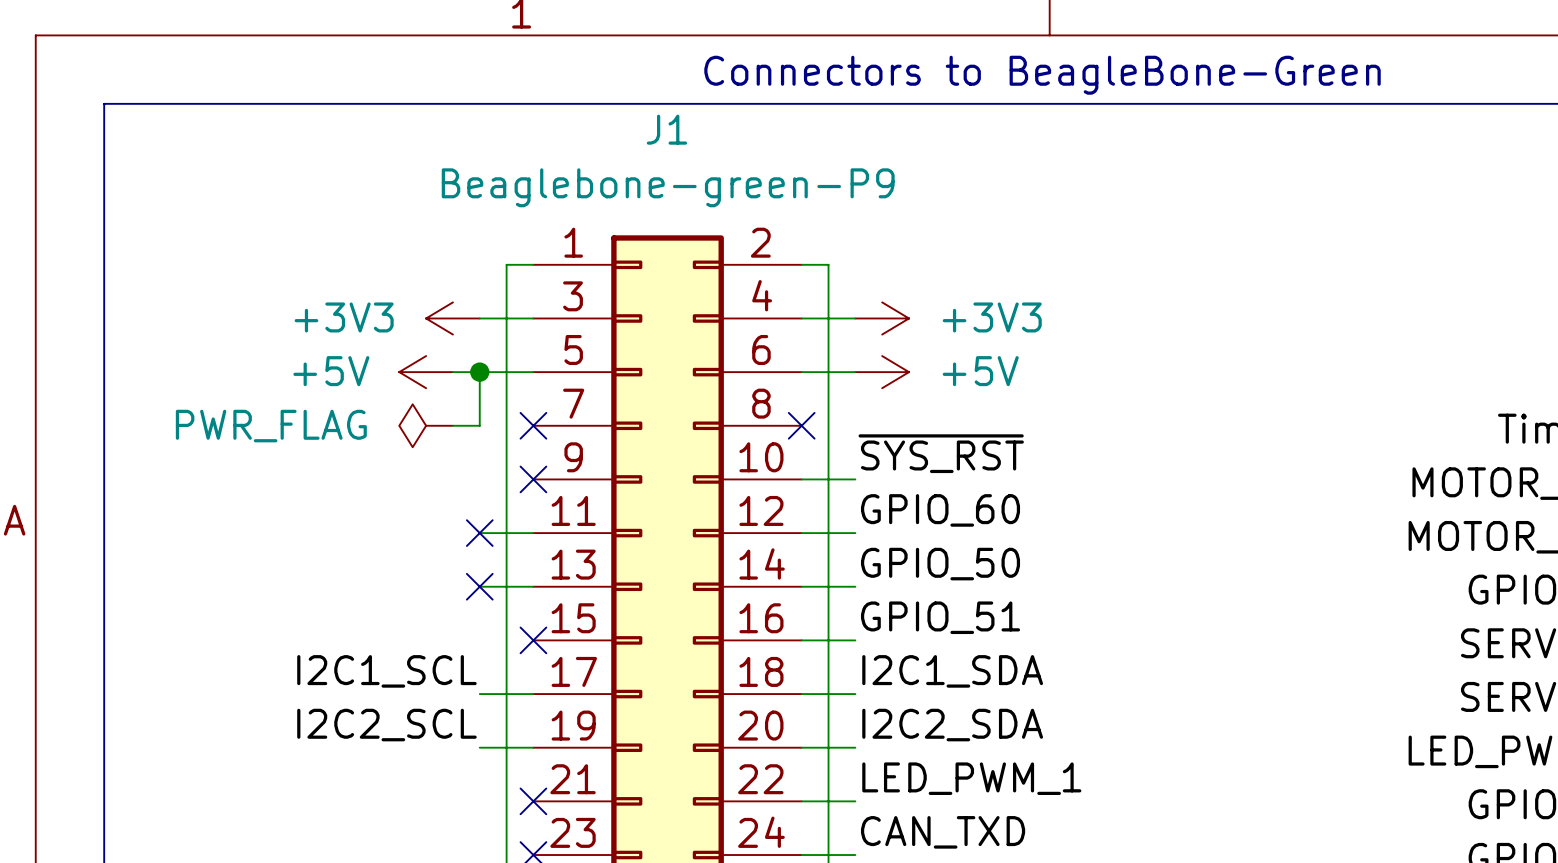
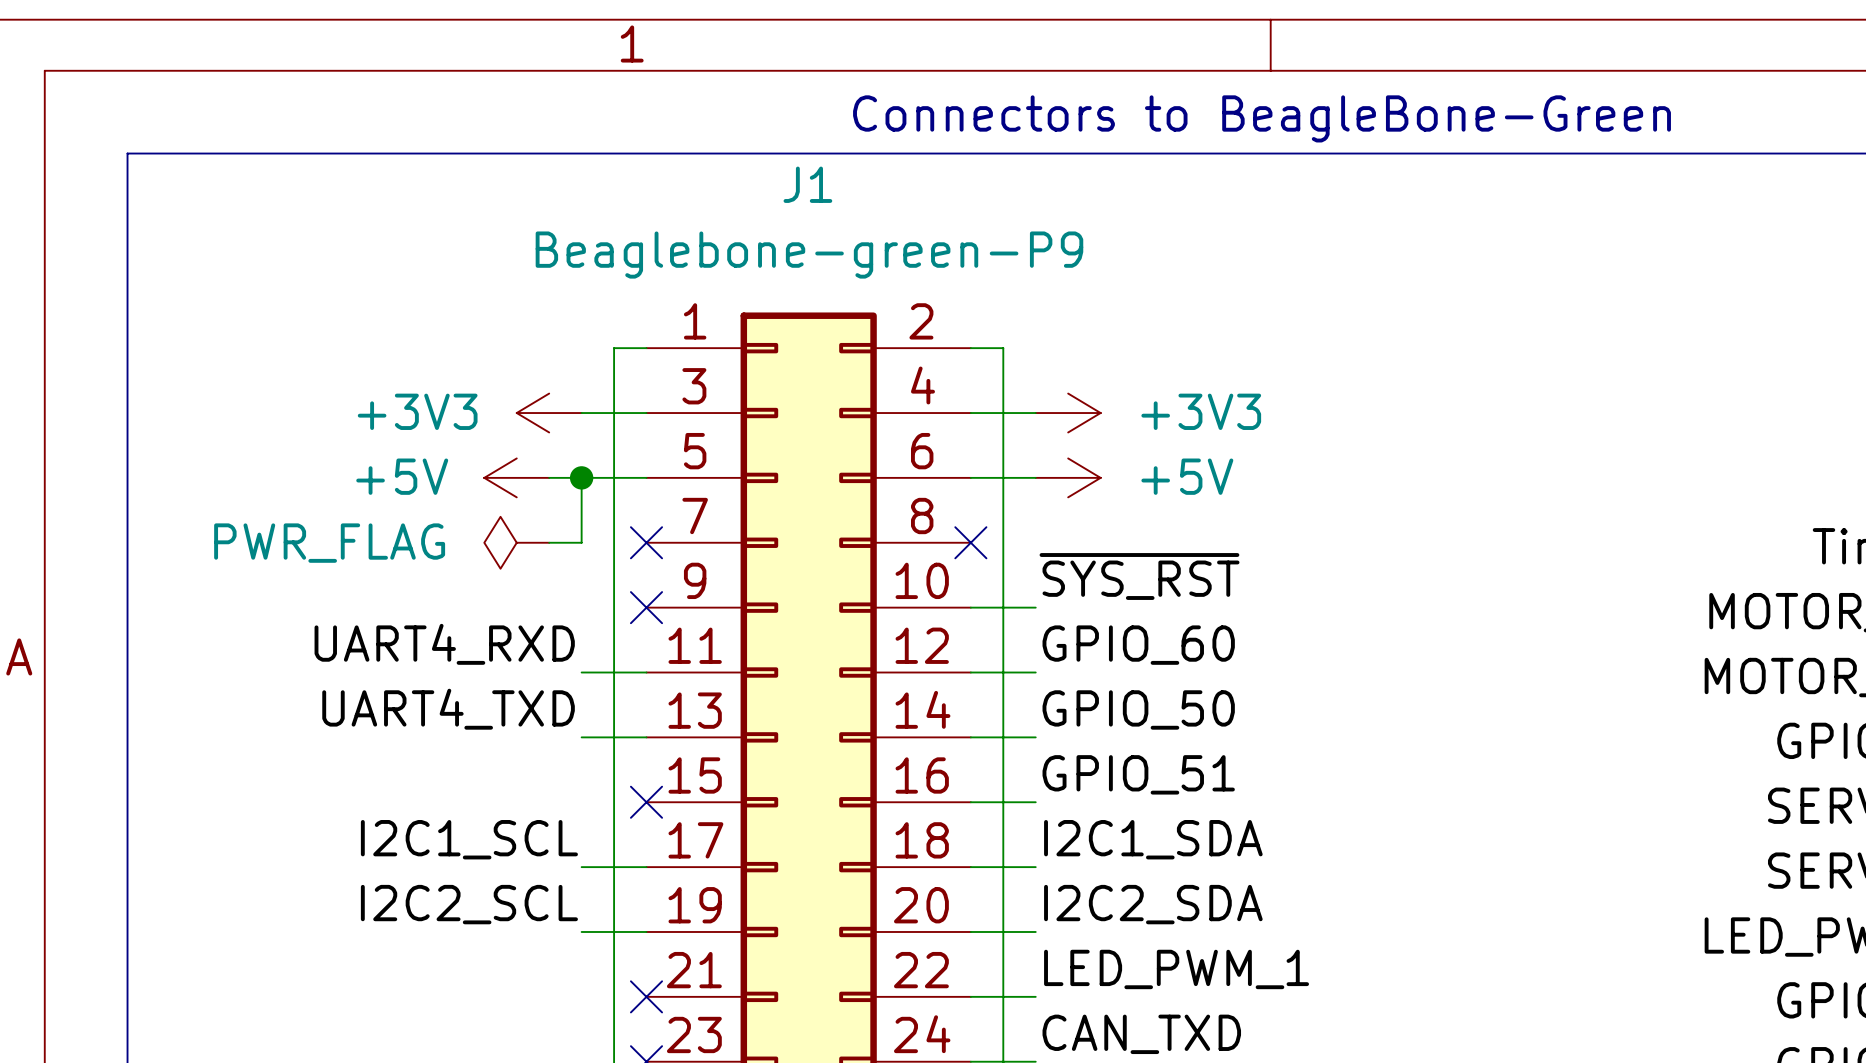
label: none -> UART4_RXD (444, 644)
no-connect mark: (479, 533) -> none
label: none -> UART4_TXD (448, 709)
no-connect mark: (479, 586) -> none

